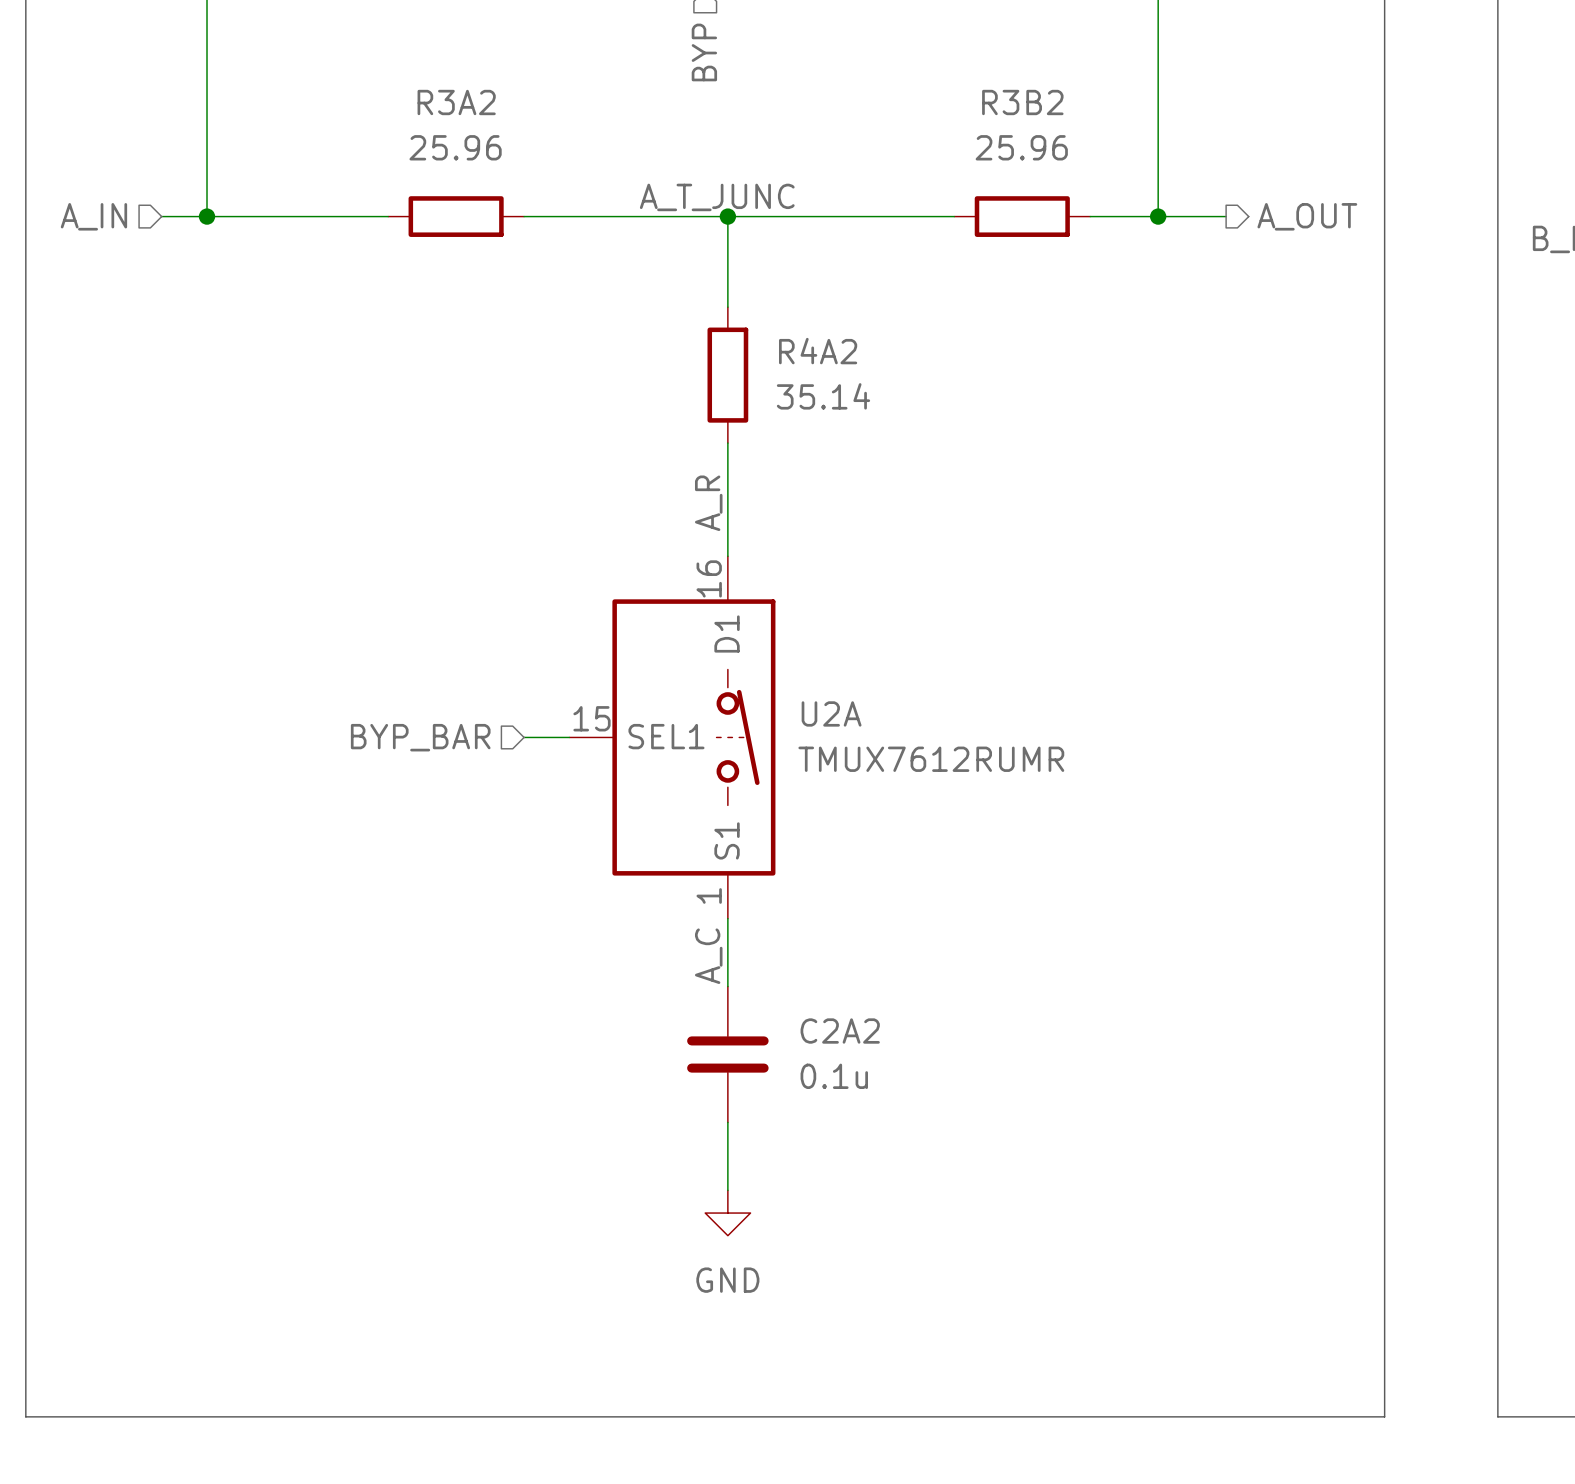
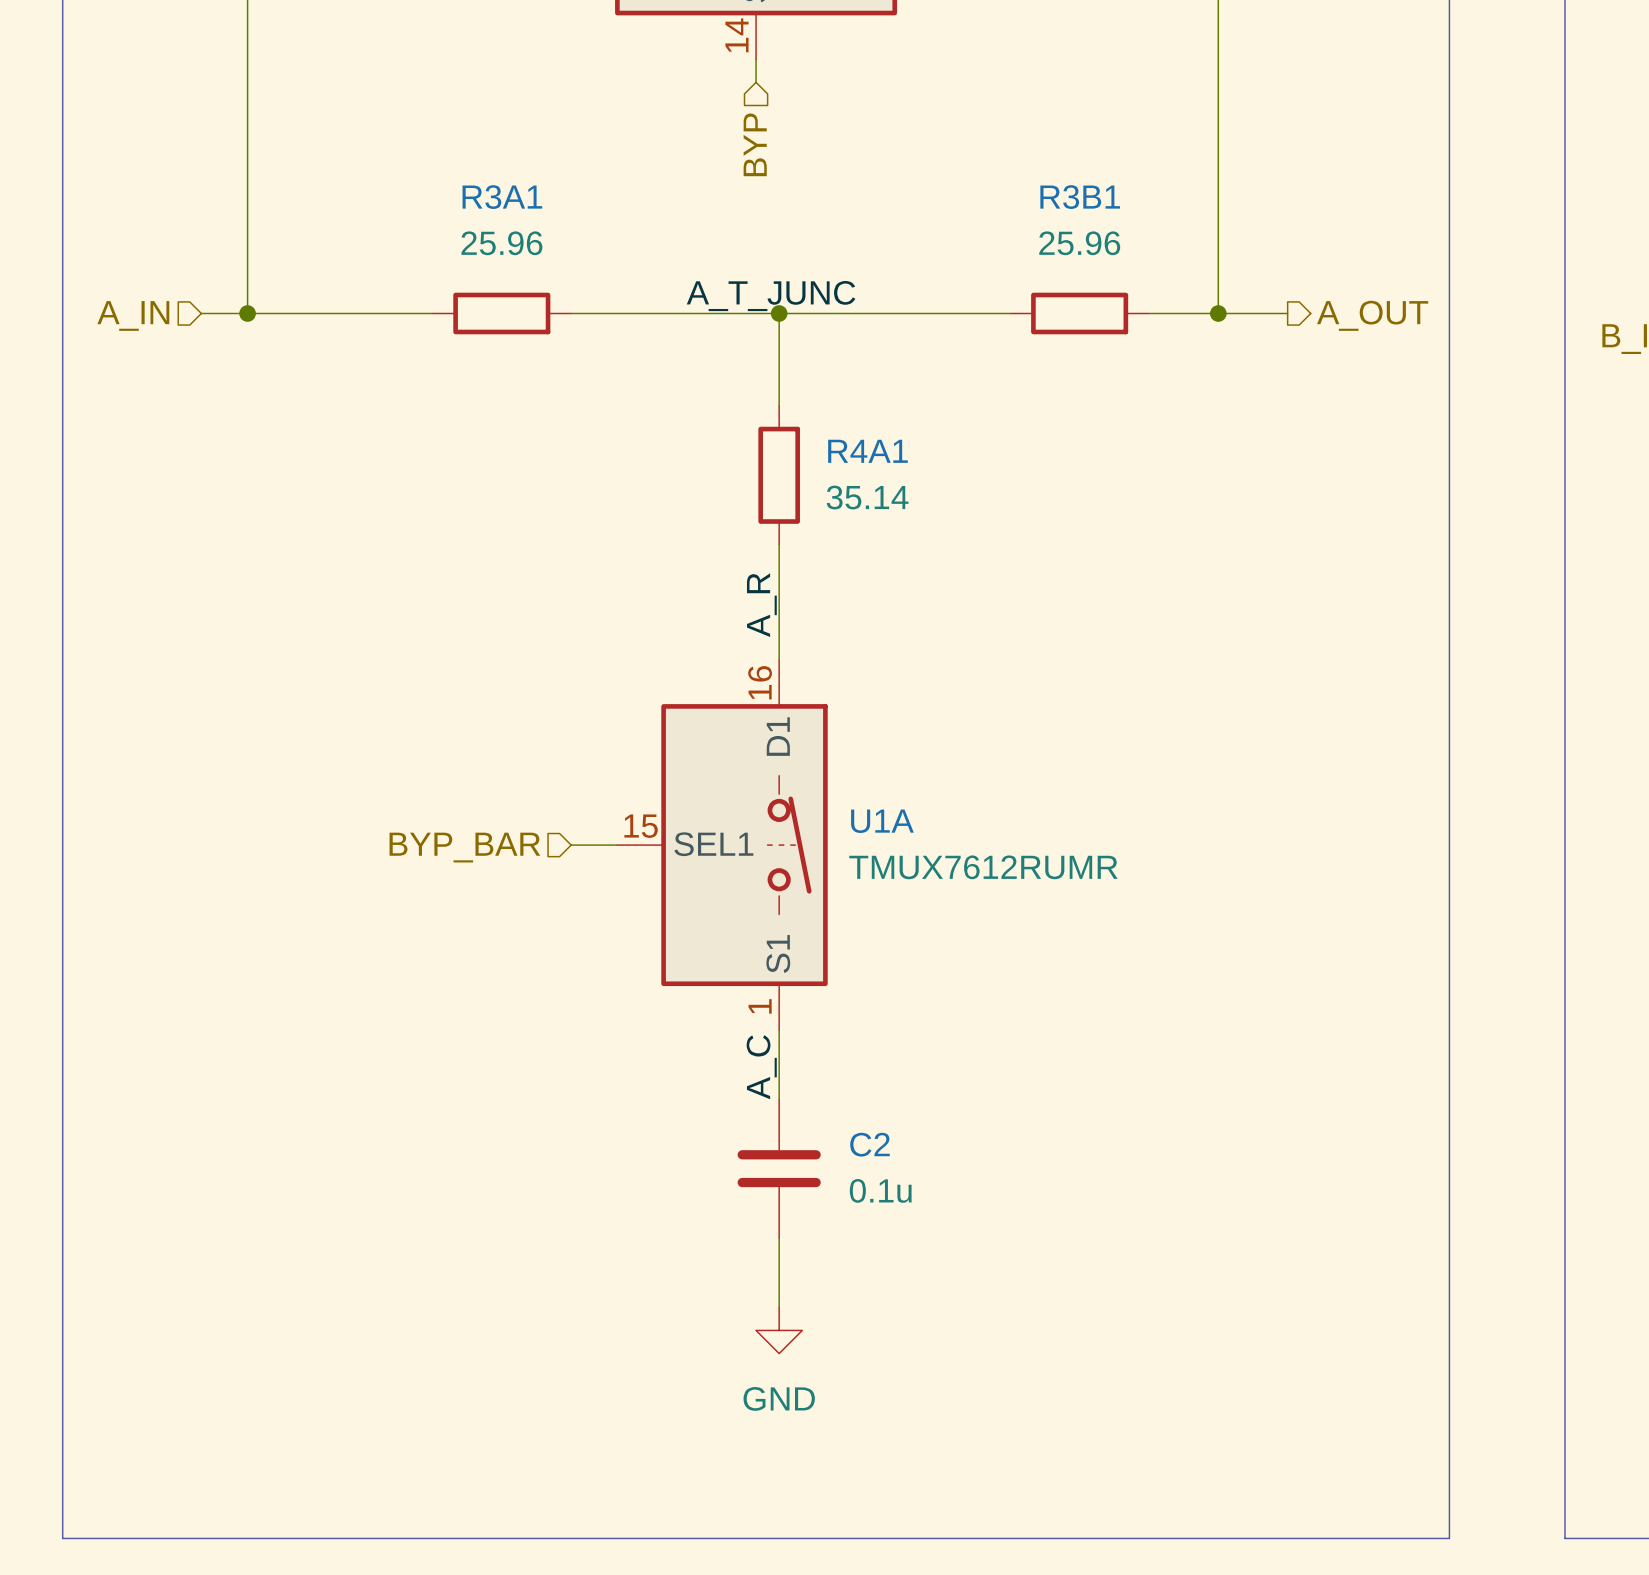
R3A2 name: R3A2 (456, 102) -> R3A1 (502, 197)
R3B2 name: R3B2 (1022, 102) -> R3B1 (1080, 197)
R4A2 name: R4A2 (818, 351) -> R4A1 (867, 451)
U2A name: U2A (831, 713) -> U1A (882, 821)
C2A2 name: C2A2 (840, 1031) -> C2 (869, 1144)

